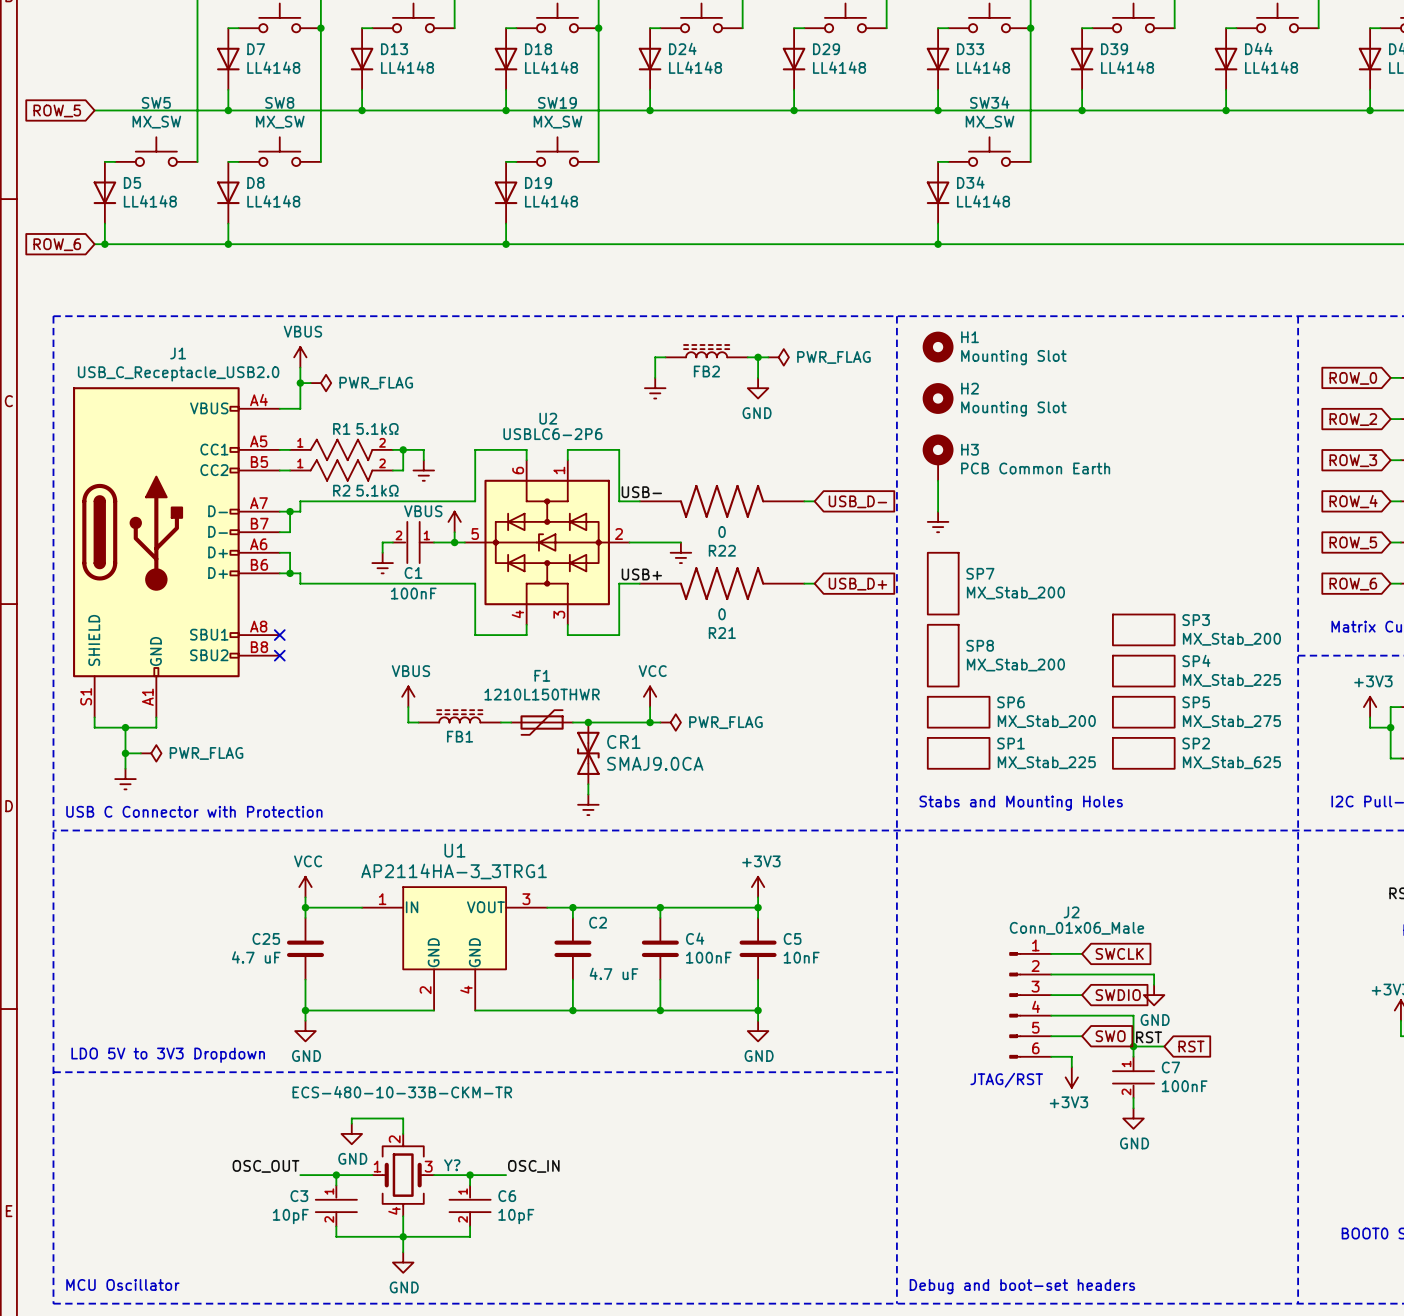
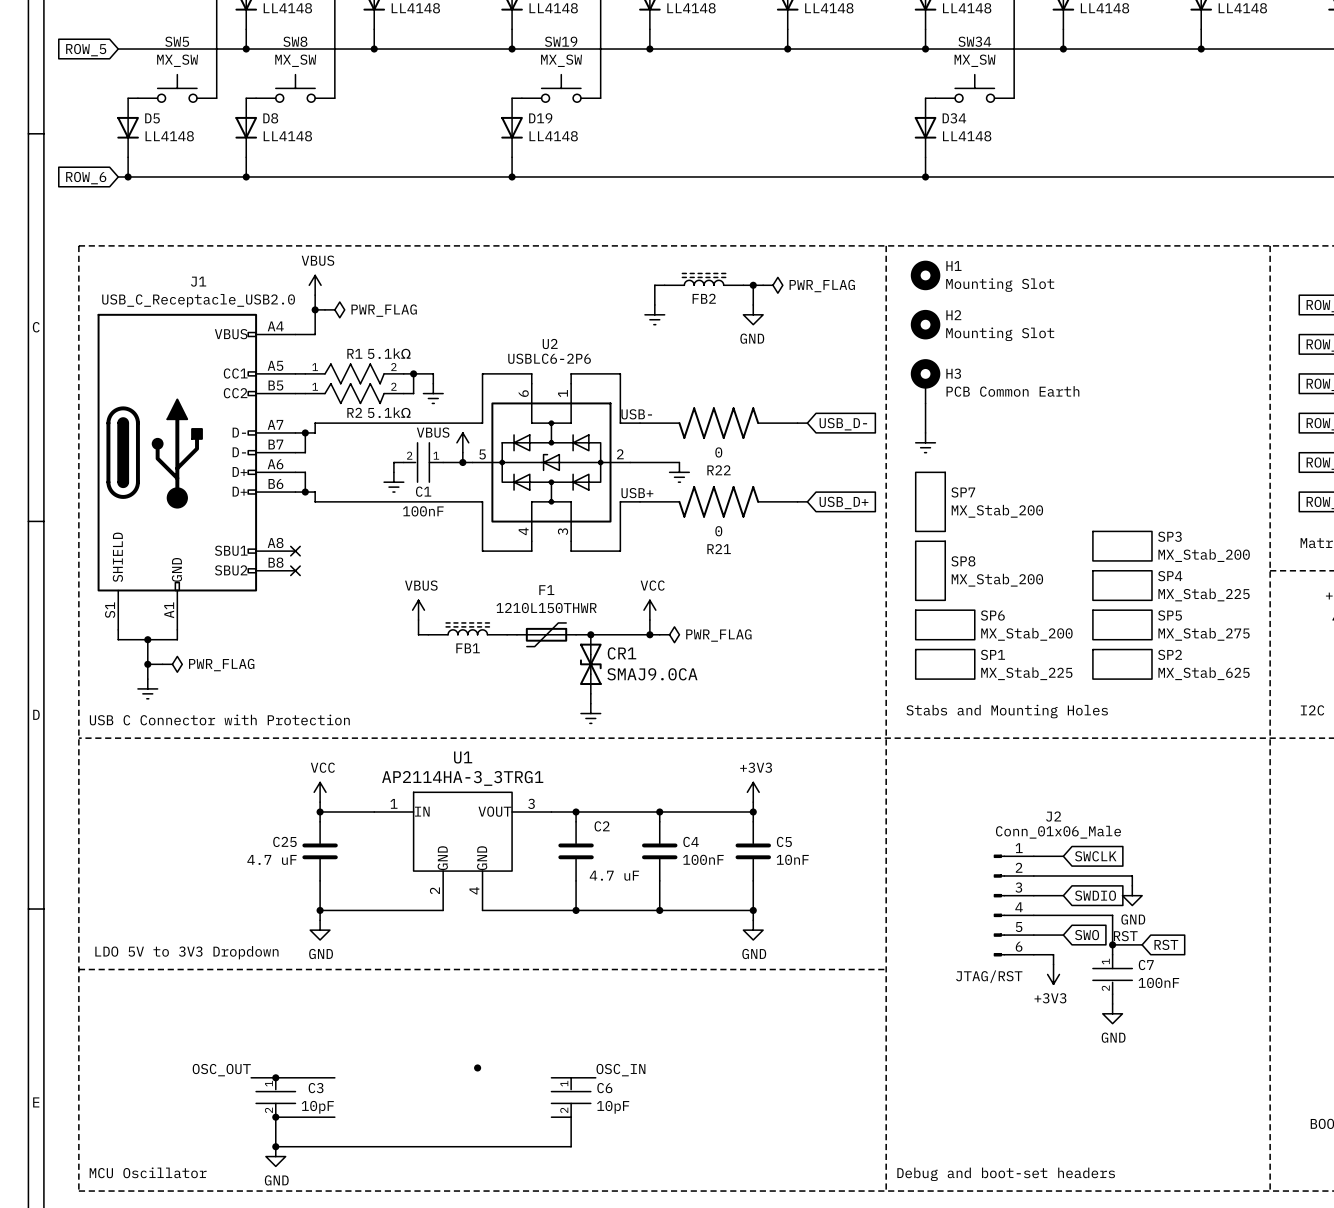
wire: (351, 1123) (351, 1118) (403, 1118) (403, 1133) -> none
power symbol: GND (351, 1133) -> none
label position: OSC_OUT (265, 1166) -> OSC_OUT (221, 1070)
label position: OSC_IN (533, 1166) -> OSC_IN (620, 1070)
wire: (300, 1175) (372, 1175) -> none
wire: (336, 1175) (336, 1185) -> none
junction: (336, 1175) -> none
Y?: ECS-480-10-33B-CKM-TR (403, 1175) -> none
wire: (434, 1175) (506, 1175) -> none
wire: (470, 1175) (470, 1185) -> none
wire: none -> (251, 1077) (334, 1077)
junction: none -> (275, 1077)
wire: none -> (551, 1077) (595, 1077)
C3 position: (336, 1205) -> (275, 1097)
C6 position: (470, 1205) -> (571, 1097)
C3 text position: 10pF (290, 1216) -> 10pF (317, 1107)
wire: (403, 1216) (403, 1252) -> none
junction: none -> (275, 1117)
wire: none -> (334, 1117) (275, 1117) (275, 1146) (571, 1146) (571, 1117) (551, 1117)
wire: (336, 1226) (336, 1236) (470, 1236) (470, 1226) -> none
junction: (403, 1236) -> none
junction: none -> (275, 1146)
power symbol: GND (403, 1262) -> none
power symbol: none -> GND (275, 1156)

